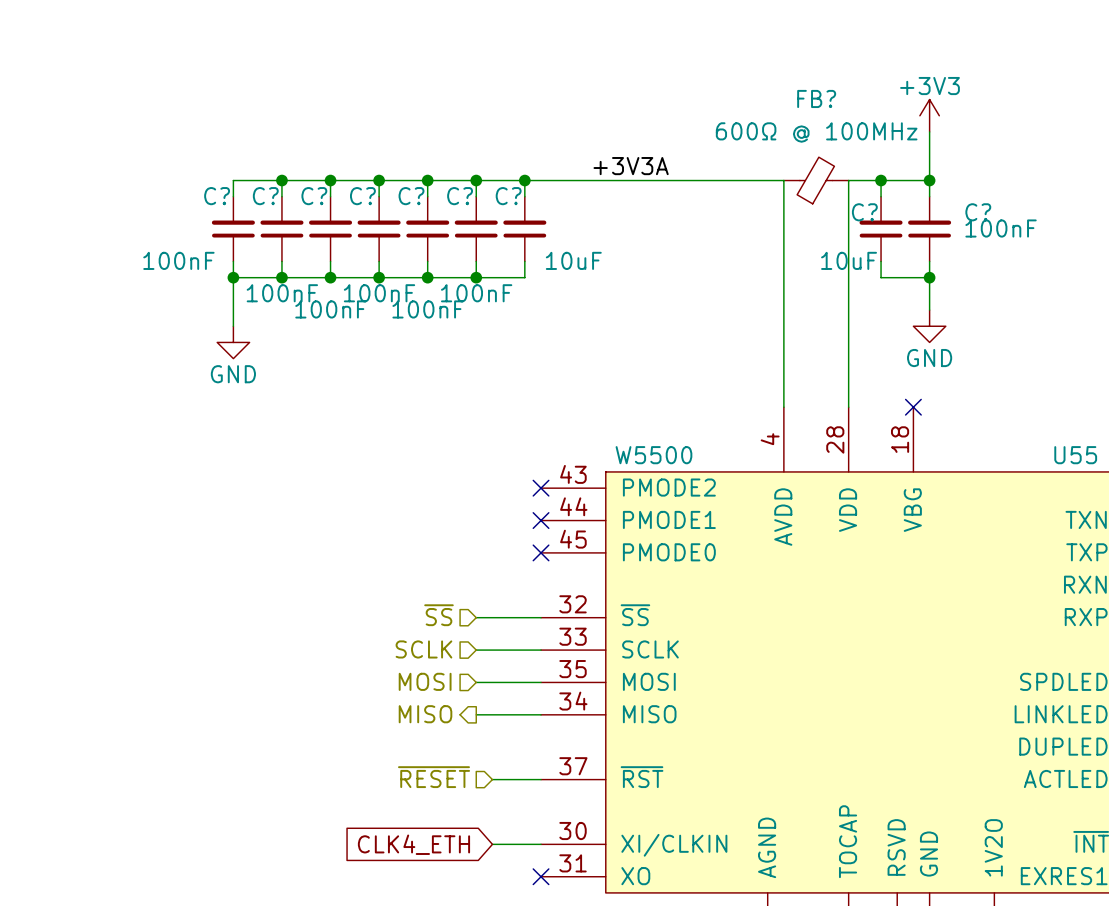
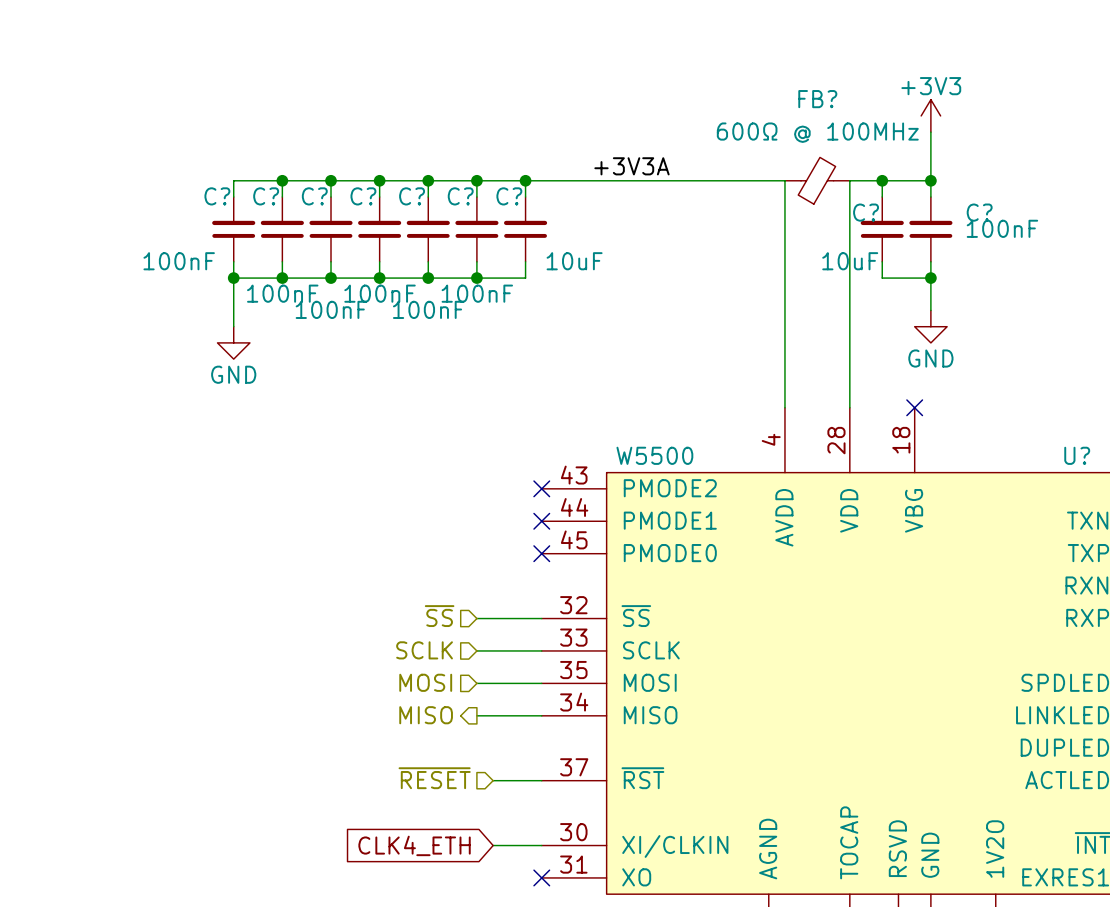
U55 name: U55 (1075, 455) -> U? (1077, 455)

